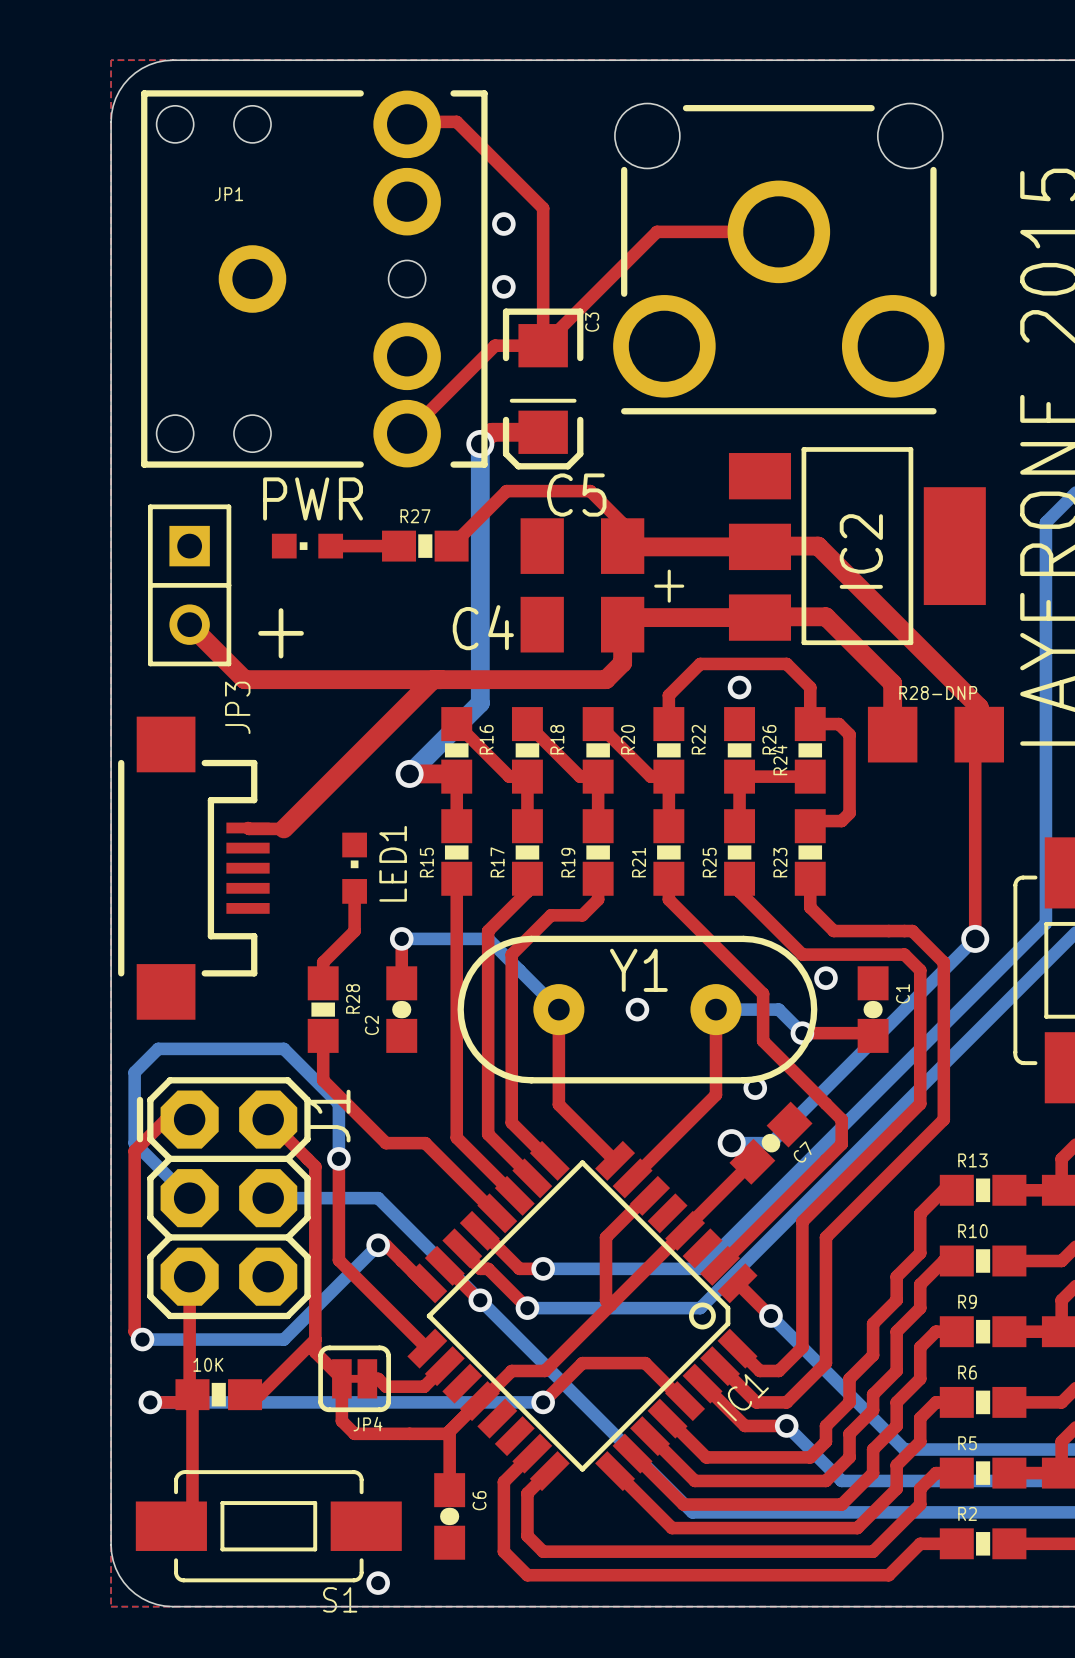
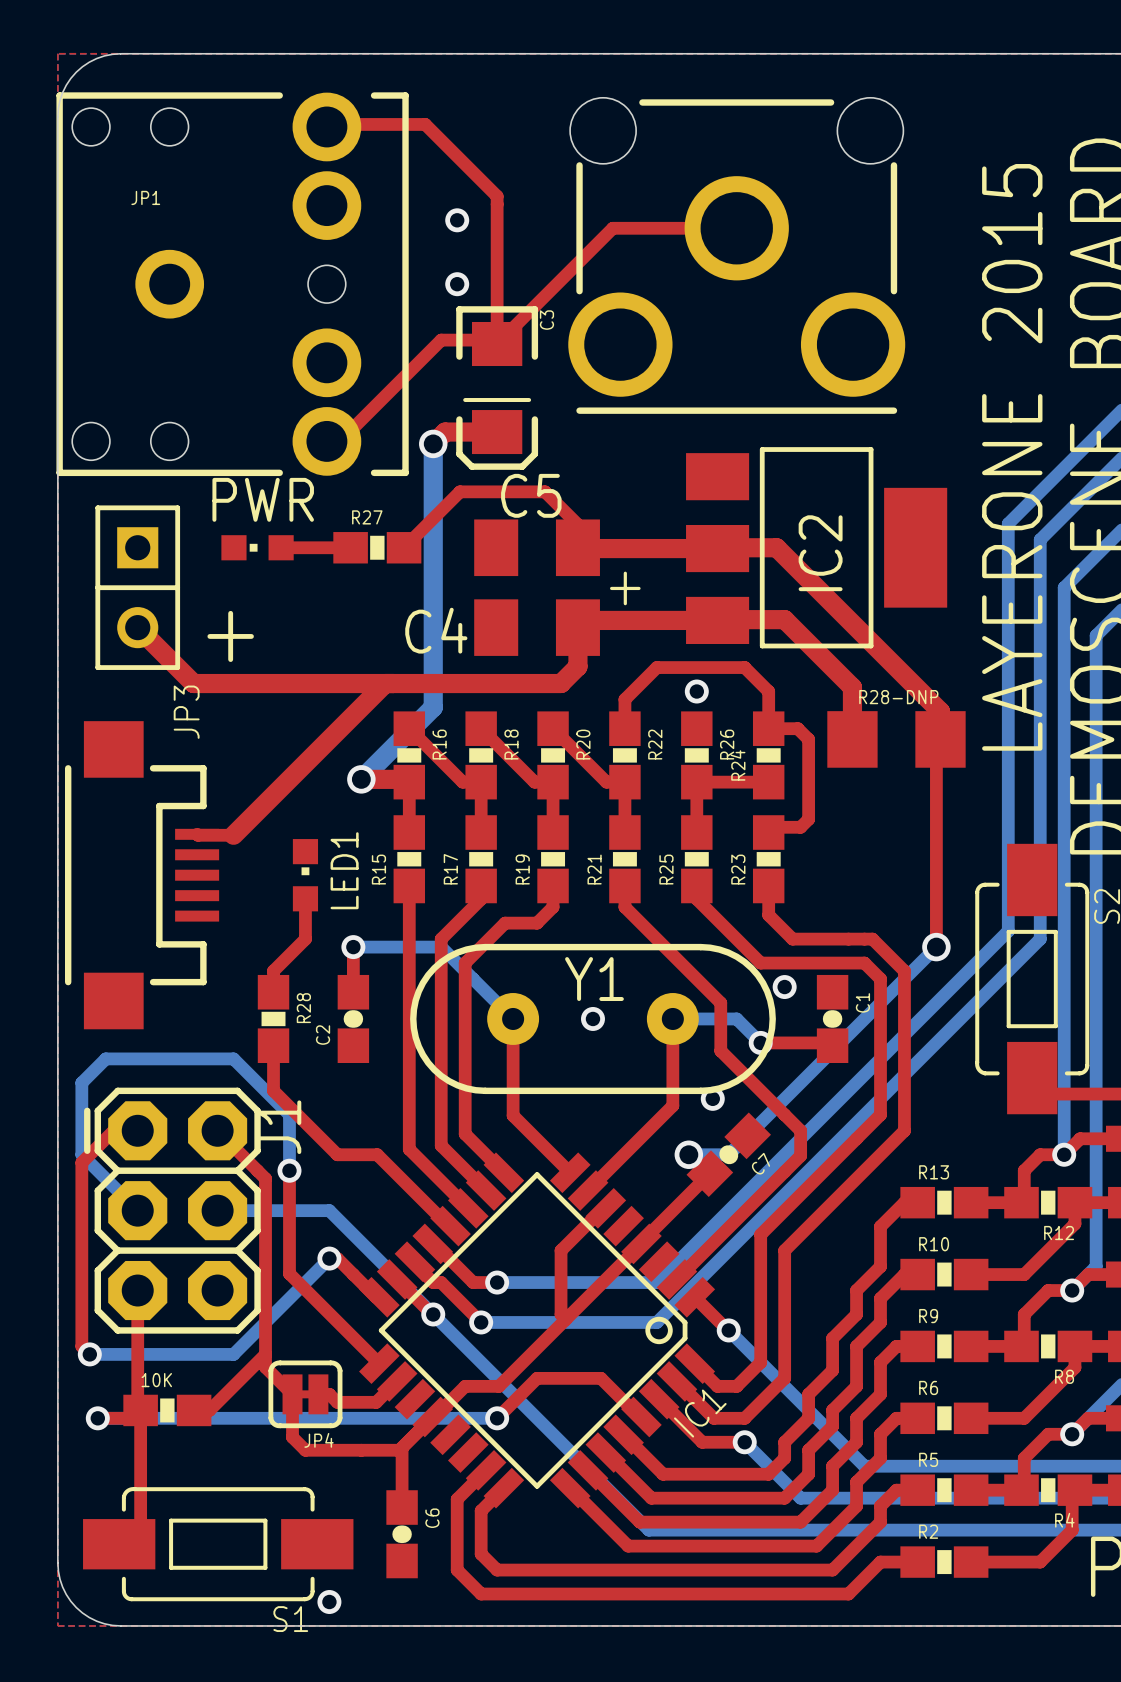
top track: (407, 124) (409, 121) (456, 121) (543, 208) -> (326, 126) (329, 124) (425, 124) (497, 196) (497, 204)
JP1 position: (314, 279) -> (232, 284)
top track: (543, 345) (495, 345) (407, 433) -> (497, 344) (493, 340) (441, 340) (339, 441) (326, 441)

